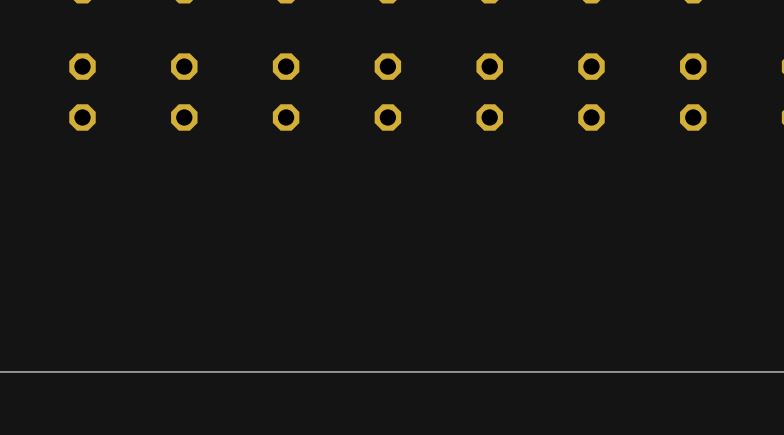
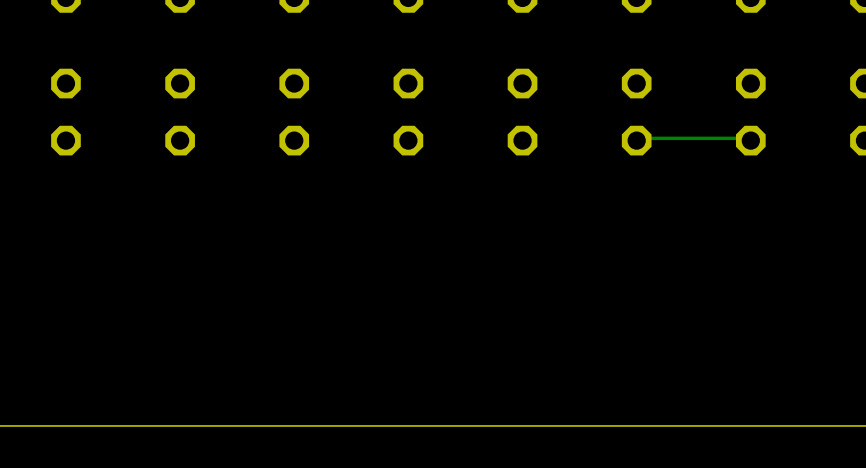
track: none -> (750, 140) (748, 138) (638, 138) (636, 140)

